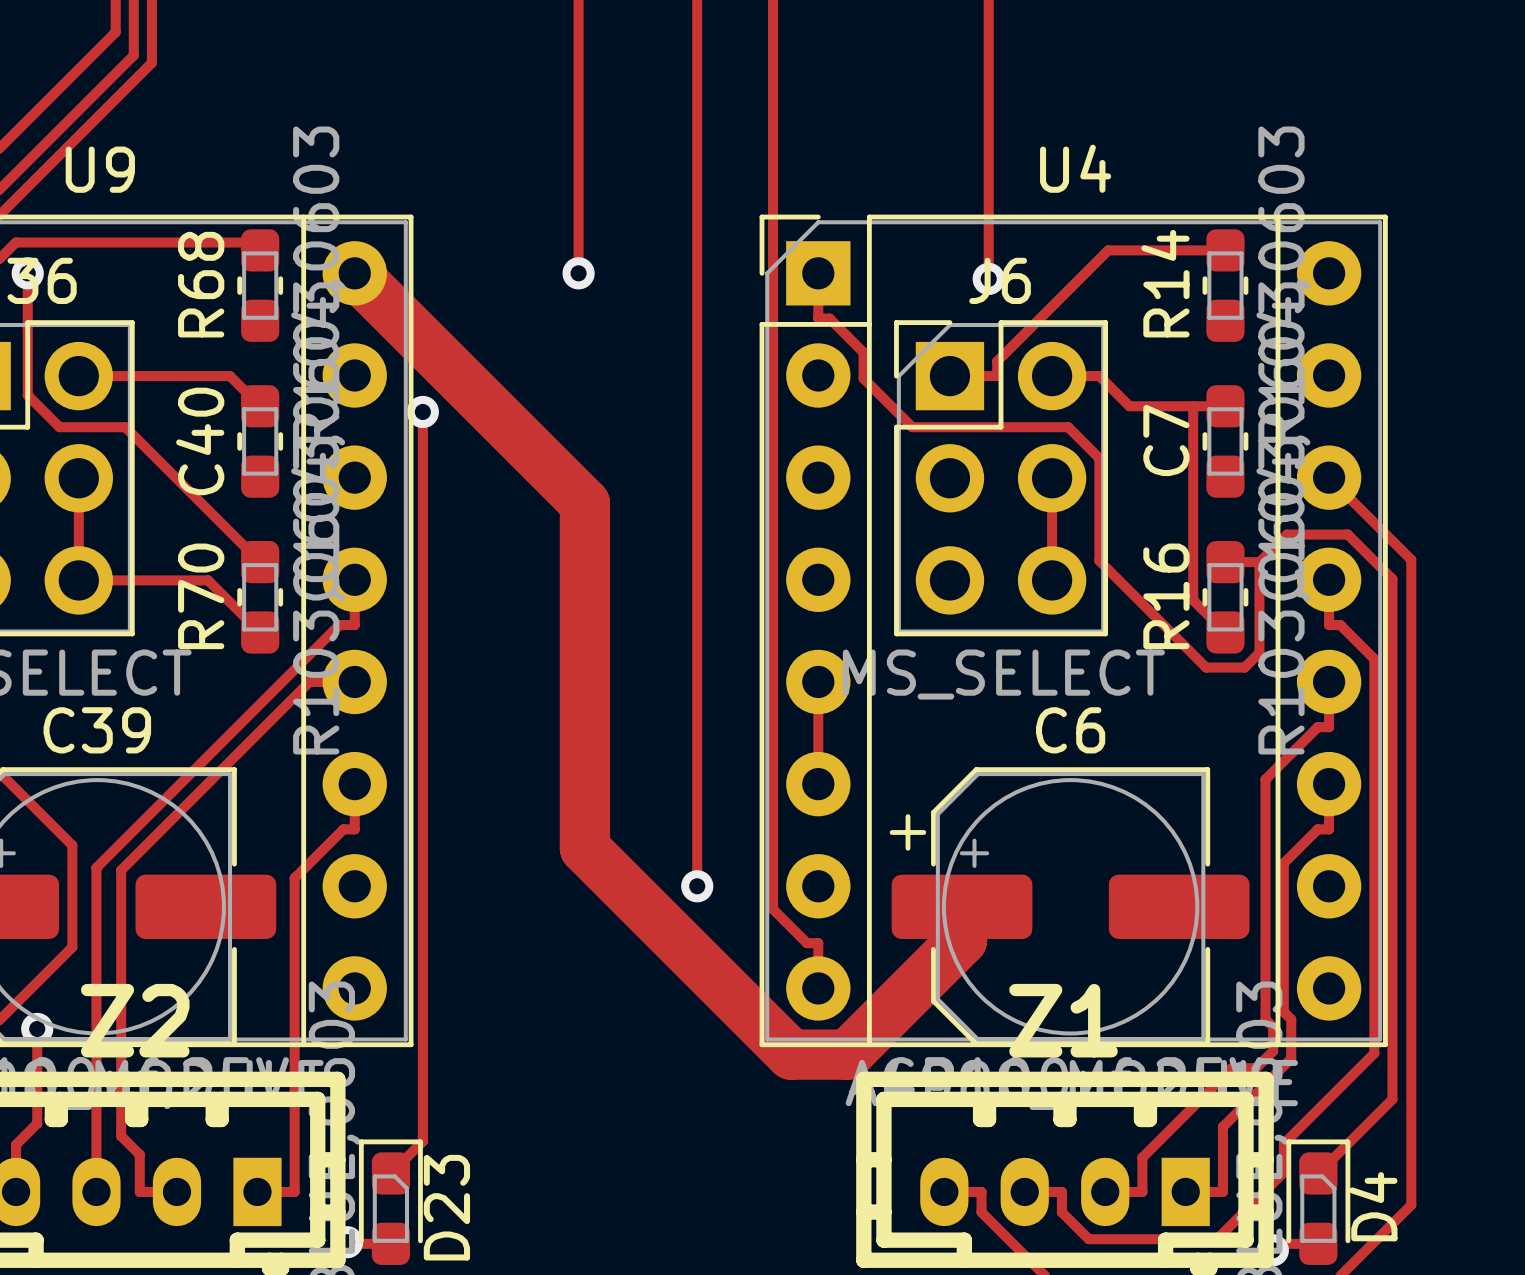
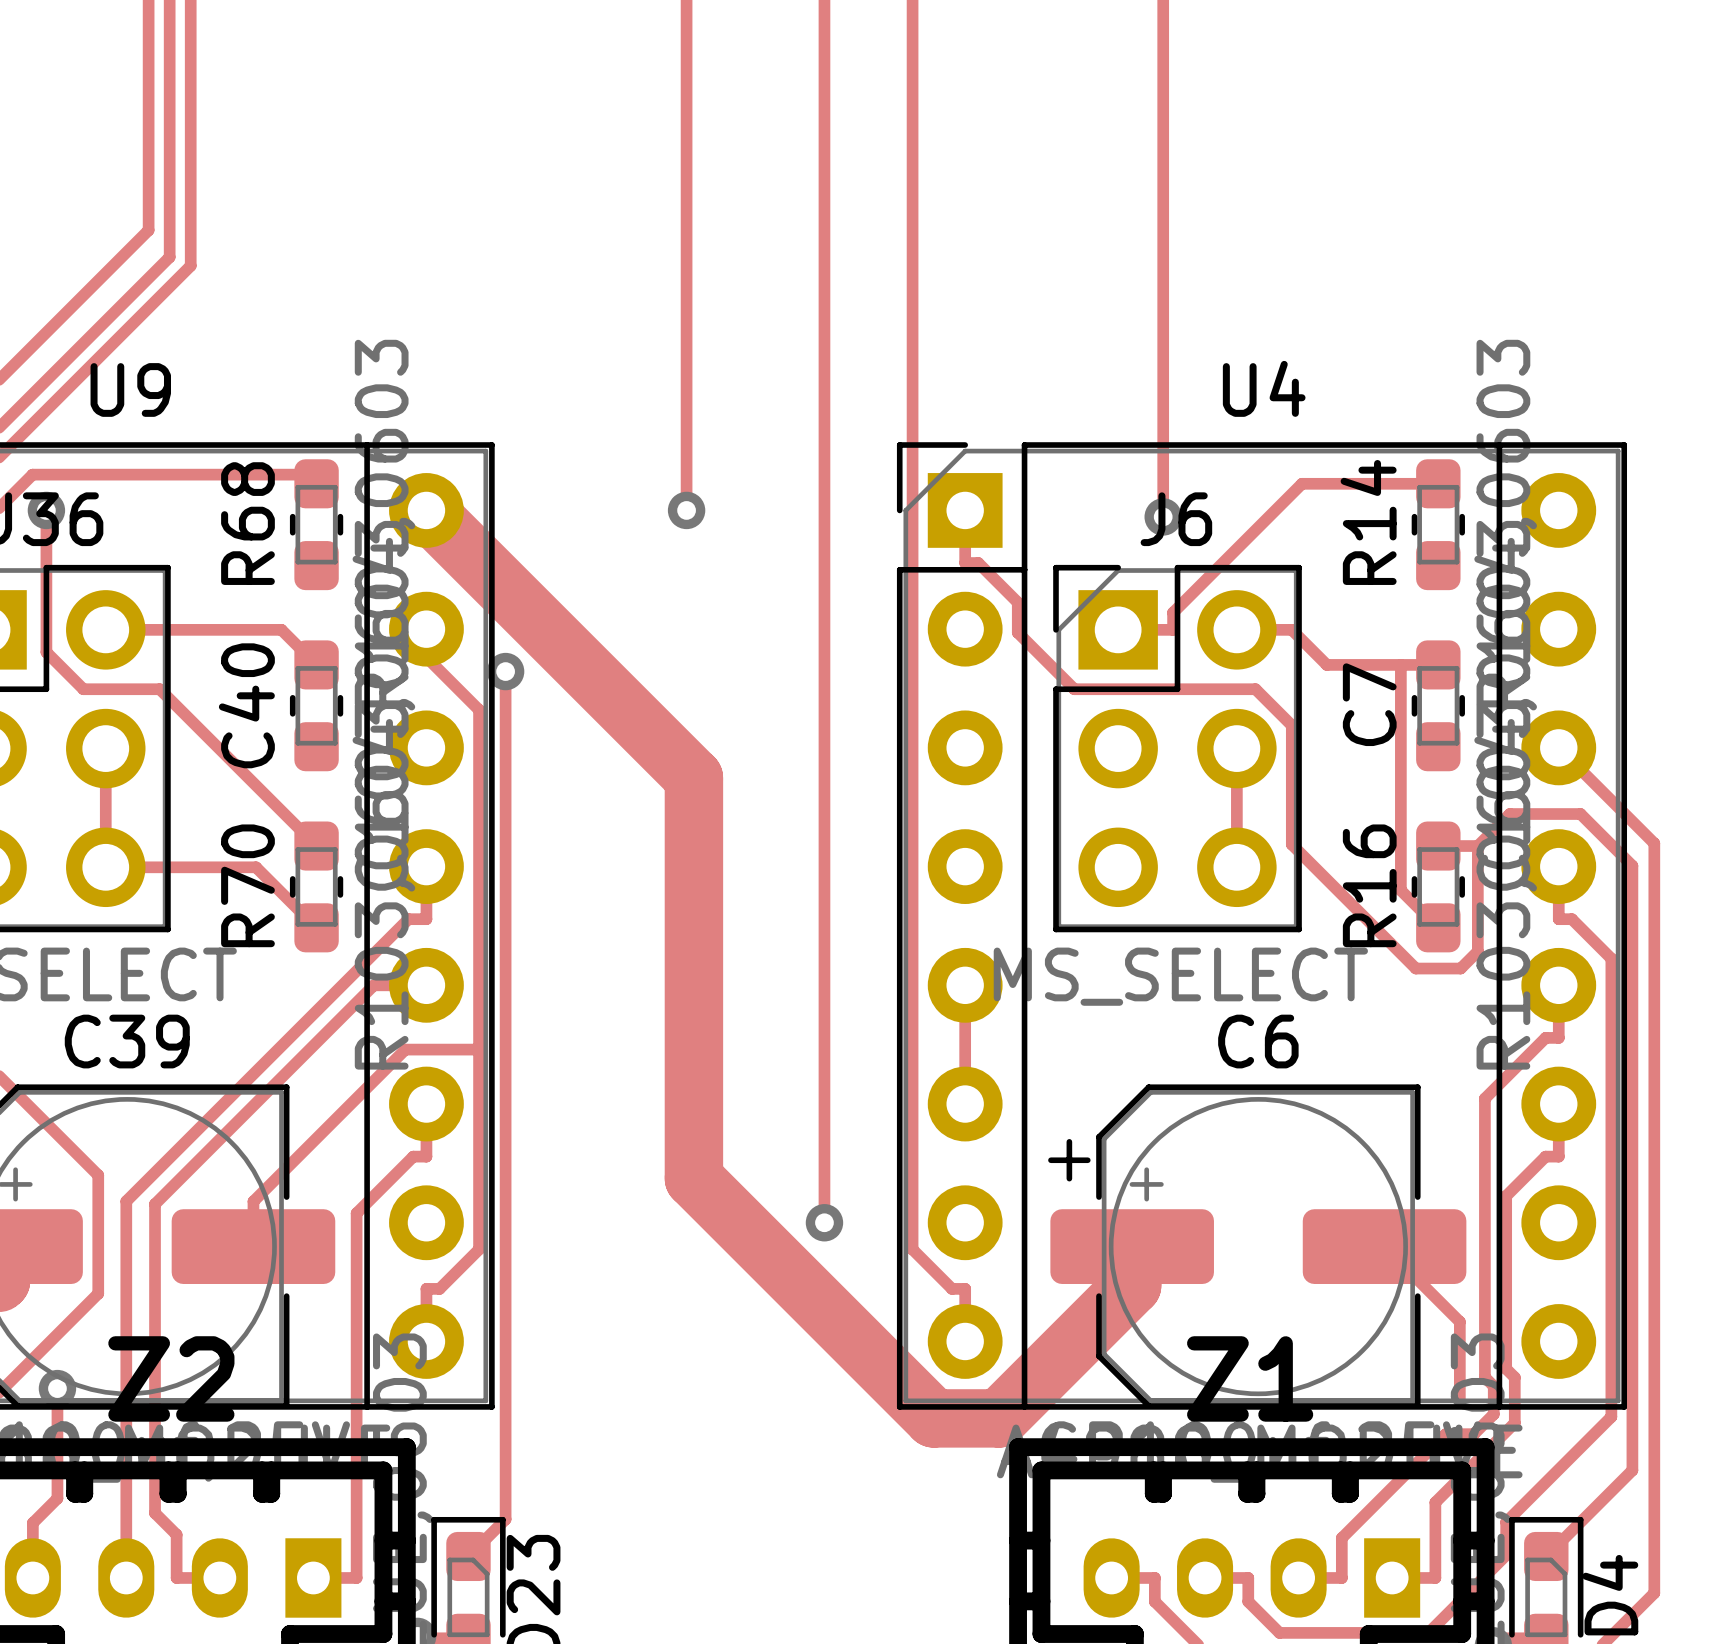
track: none -> (419, 629) (419, 650) (479, 709) (479, 1249) (439, 1288) (426, 1288) (426, 1341)
track: none -> (479, 1049) (405, 1049) (253, 1201) (253, 1246)
track: none -> (1384, 1246) (1459, 1321) (1459, 1400)

